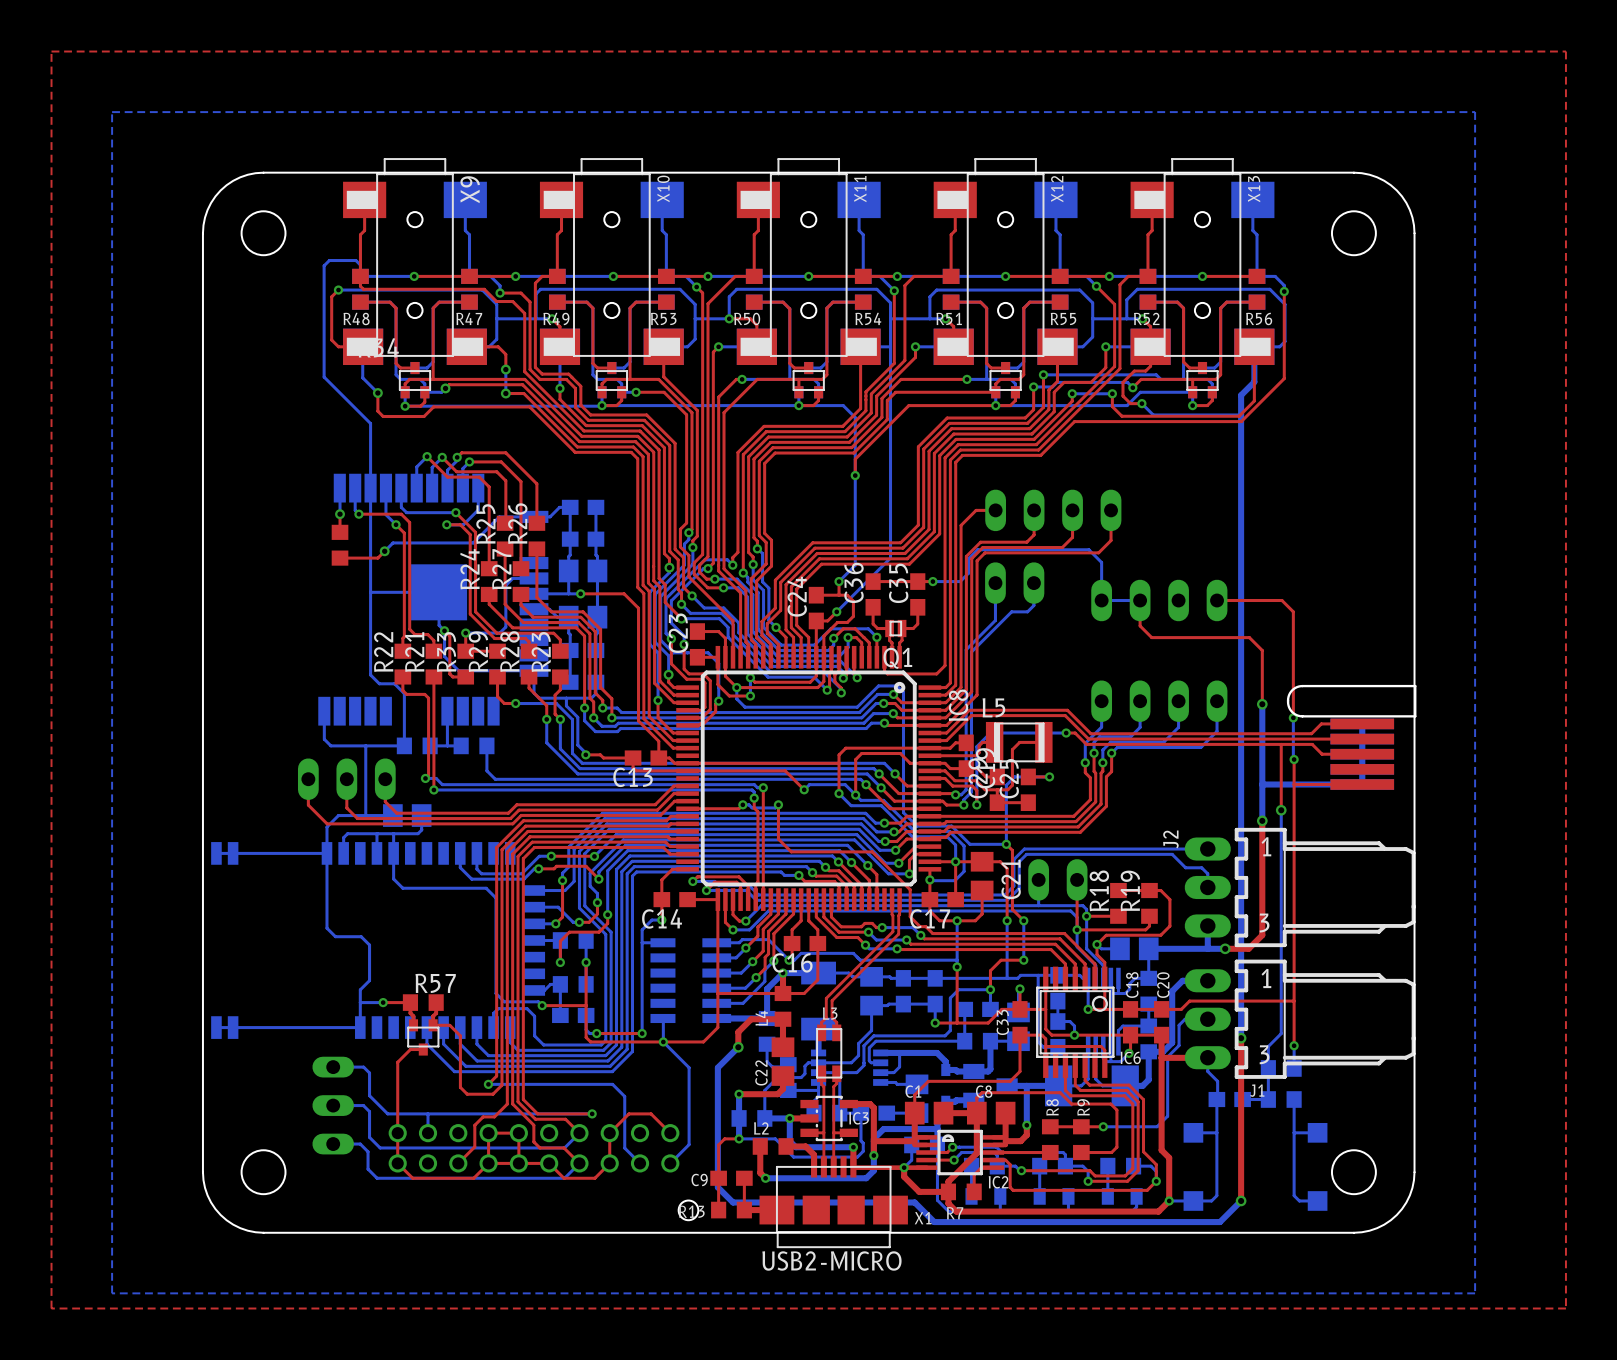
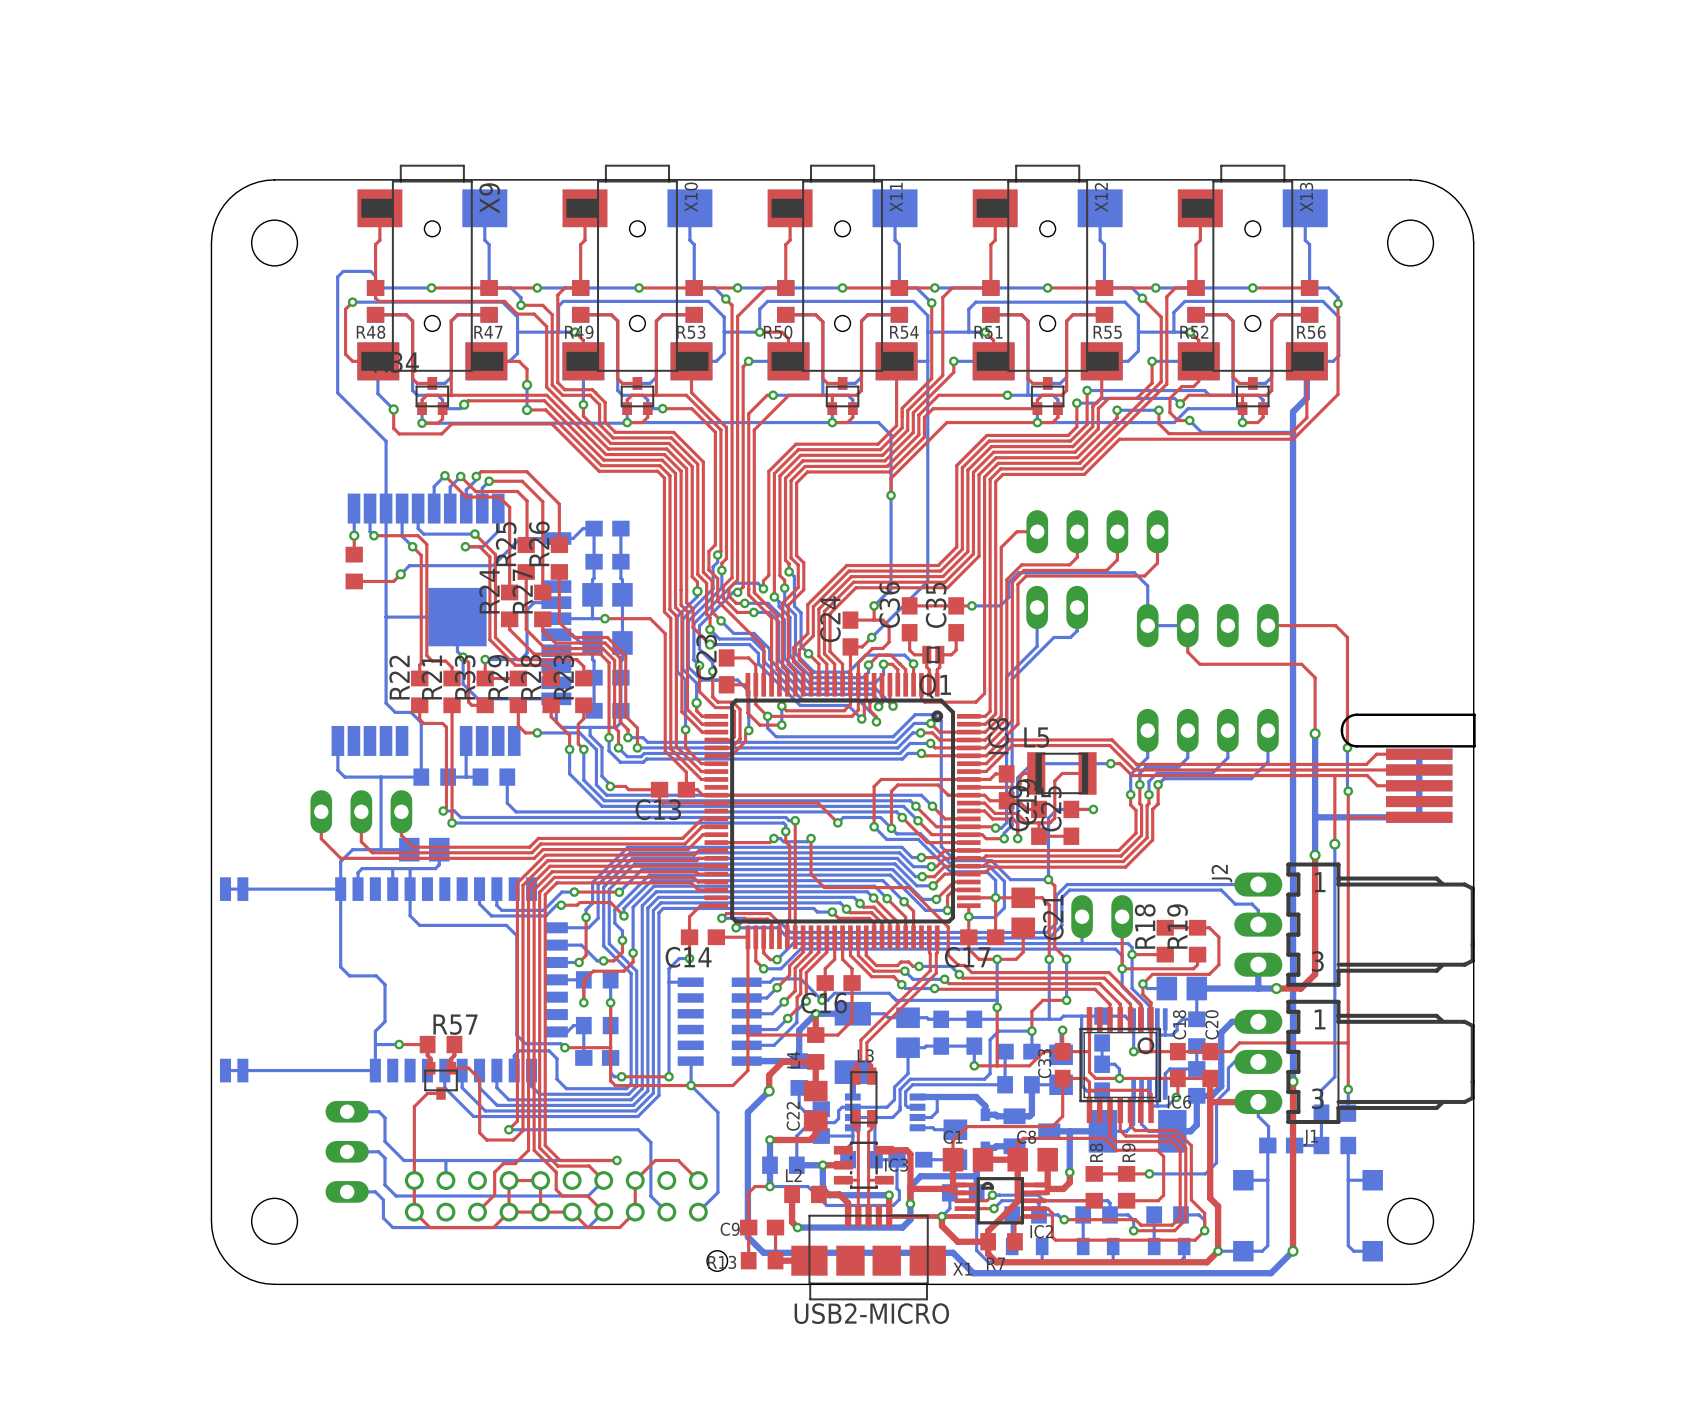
top zone outline: (51, 51) (1565, 51) (1565, 1308) (51, 1308) (51, 51) -> none
bottom zone outline: (112, 112) (1475, 112) (1475, 1293) (112, 1293) (112, 112) -> none

